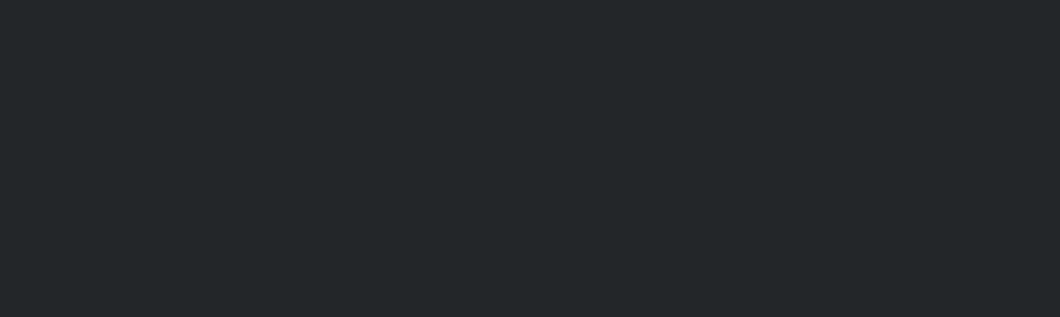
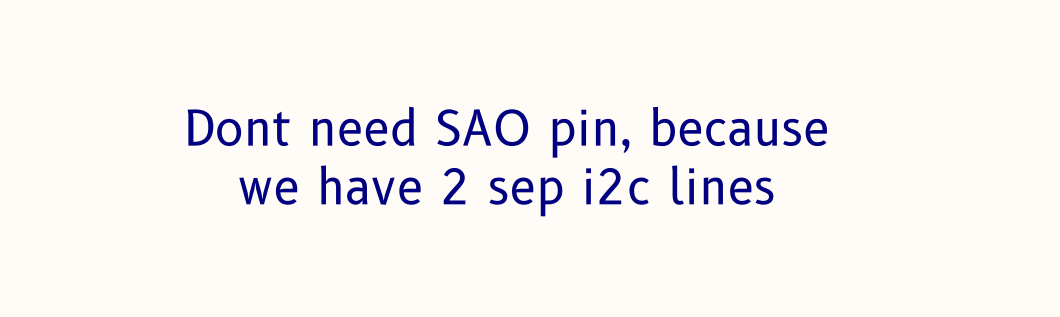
text: none -> Dont need SAO pin, because (507, 132)
text: none -> we have 2 sep i2c lines (506, 190)

